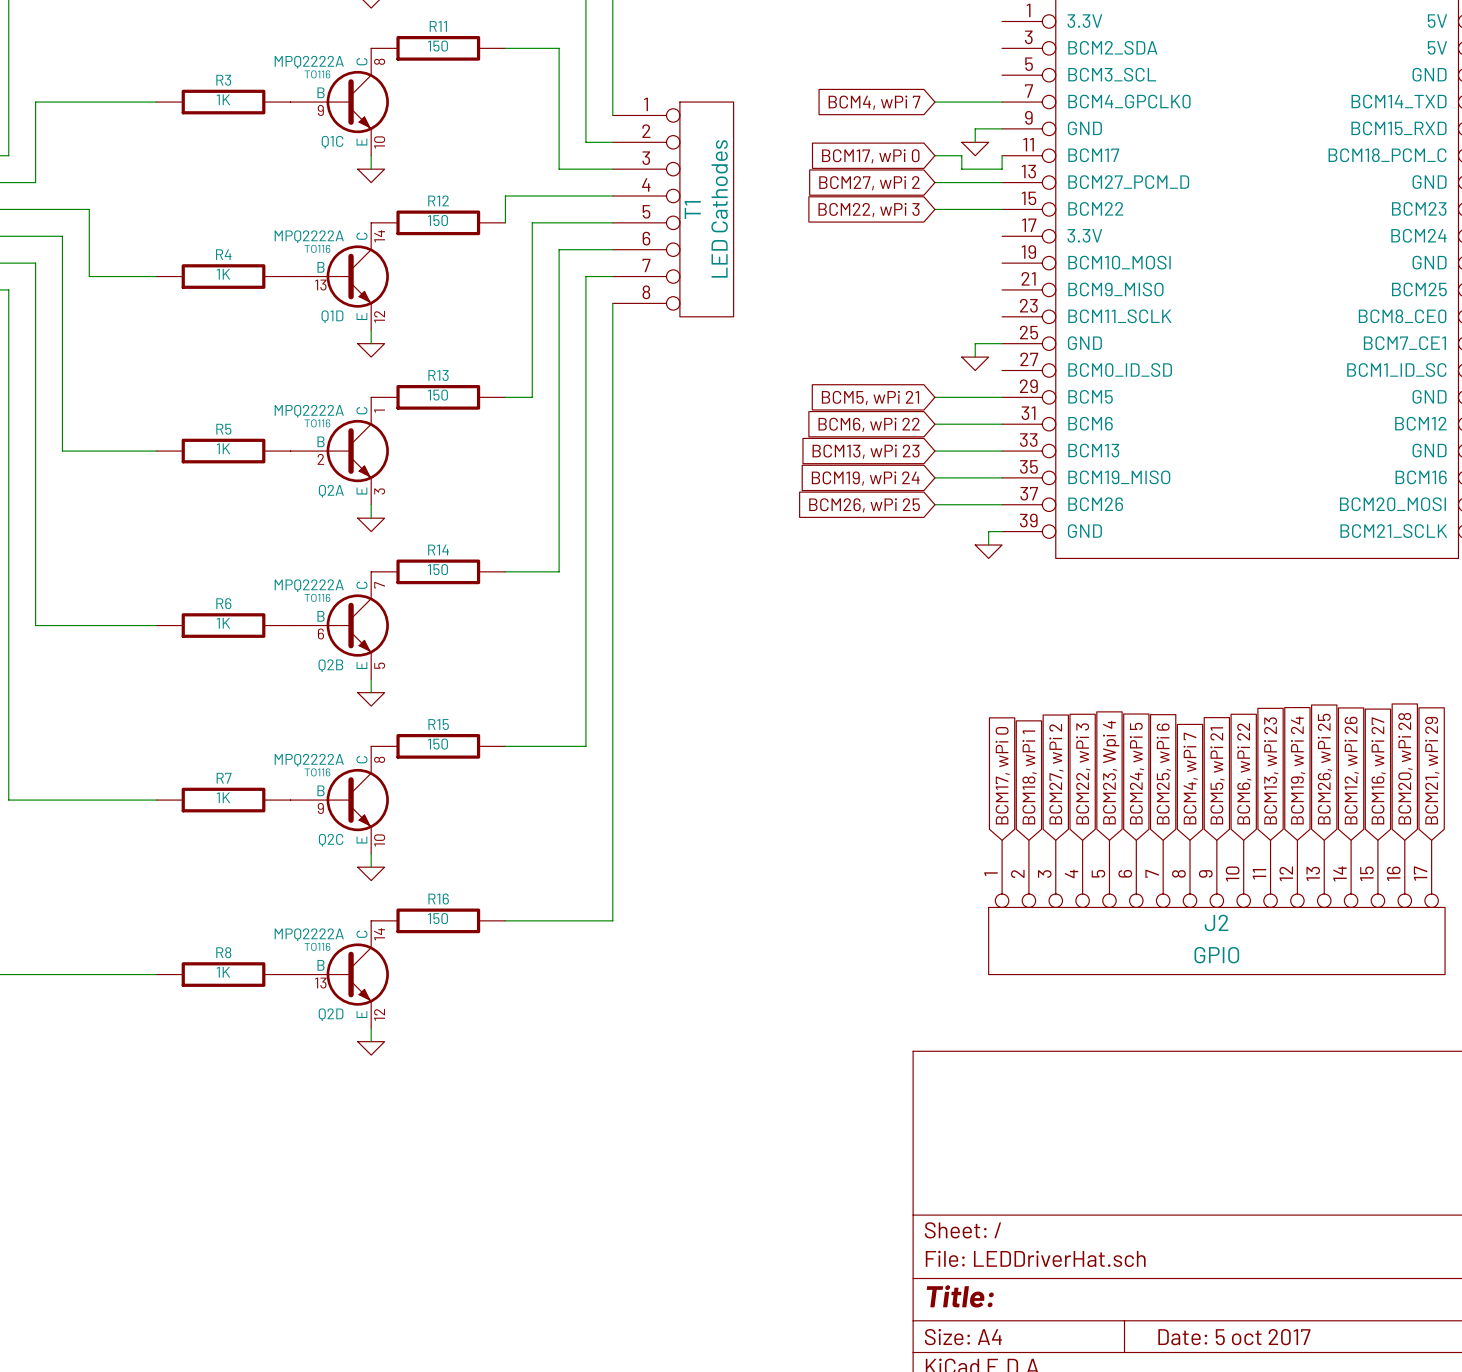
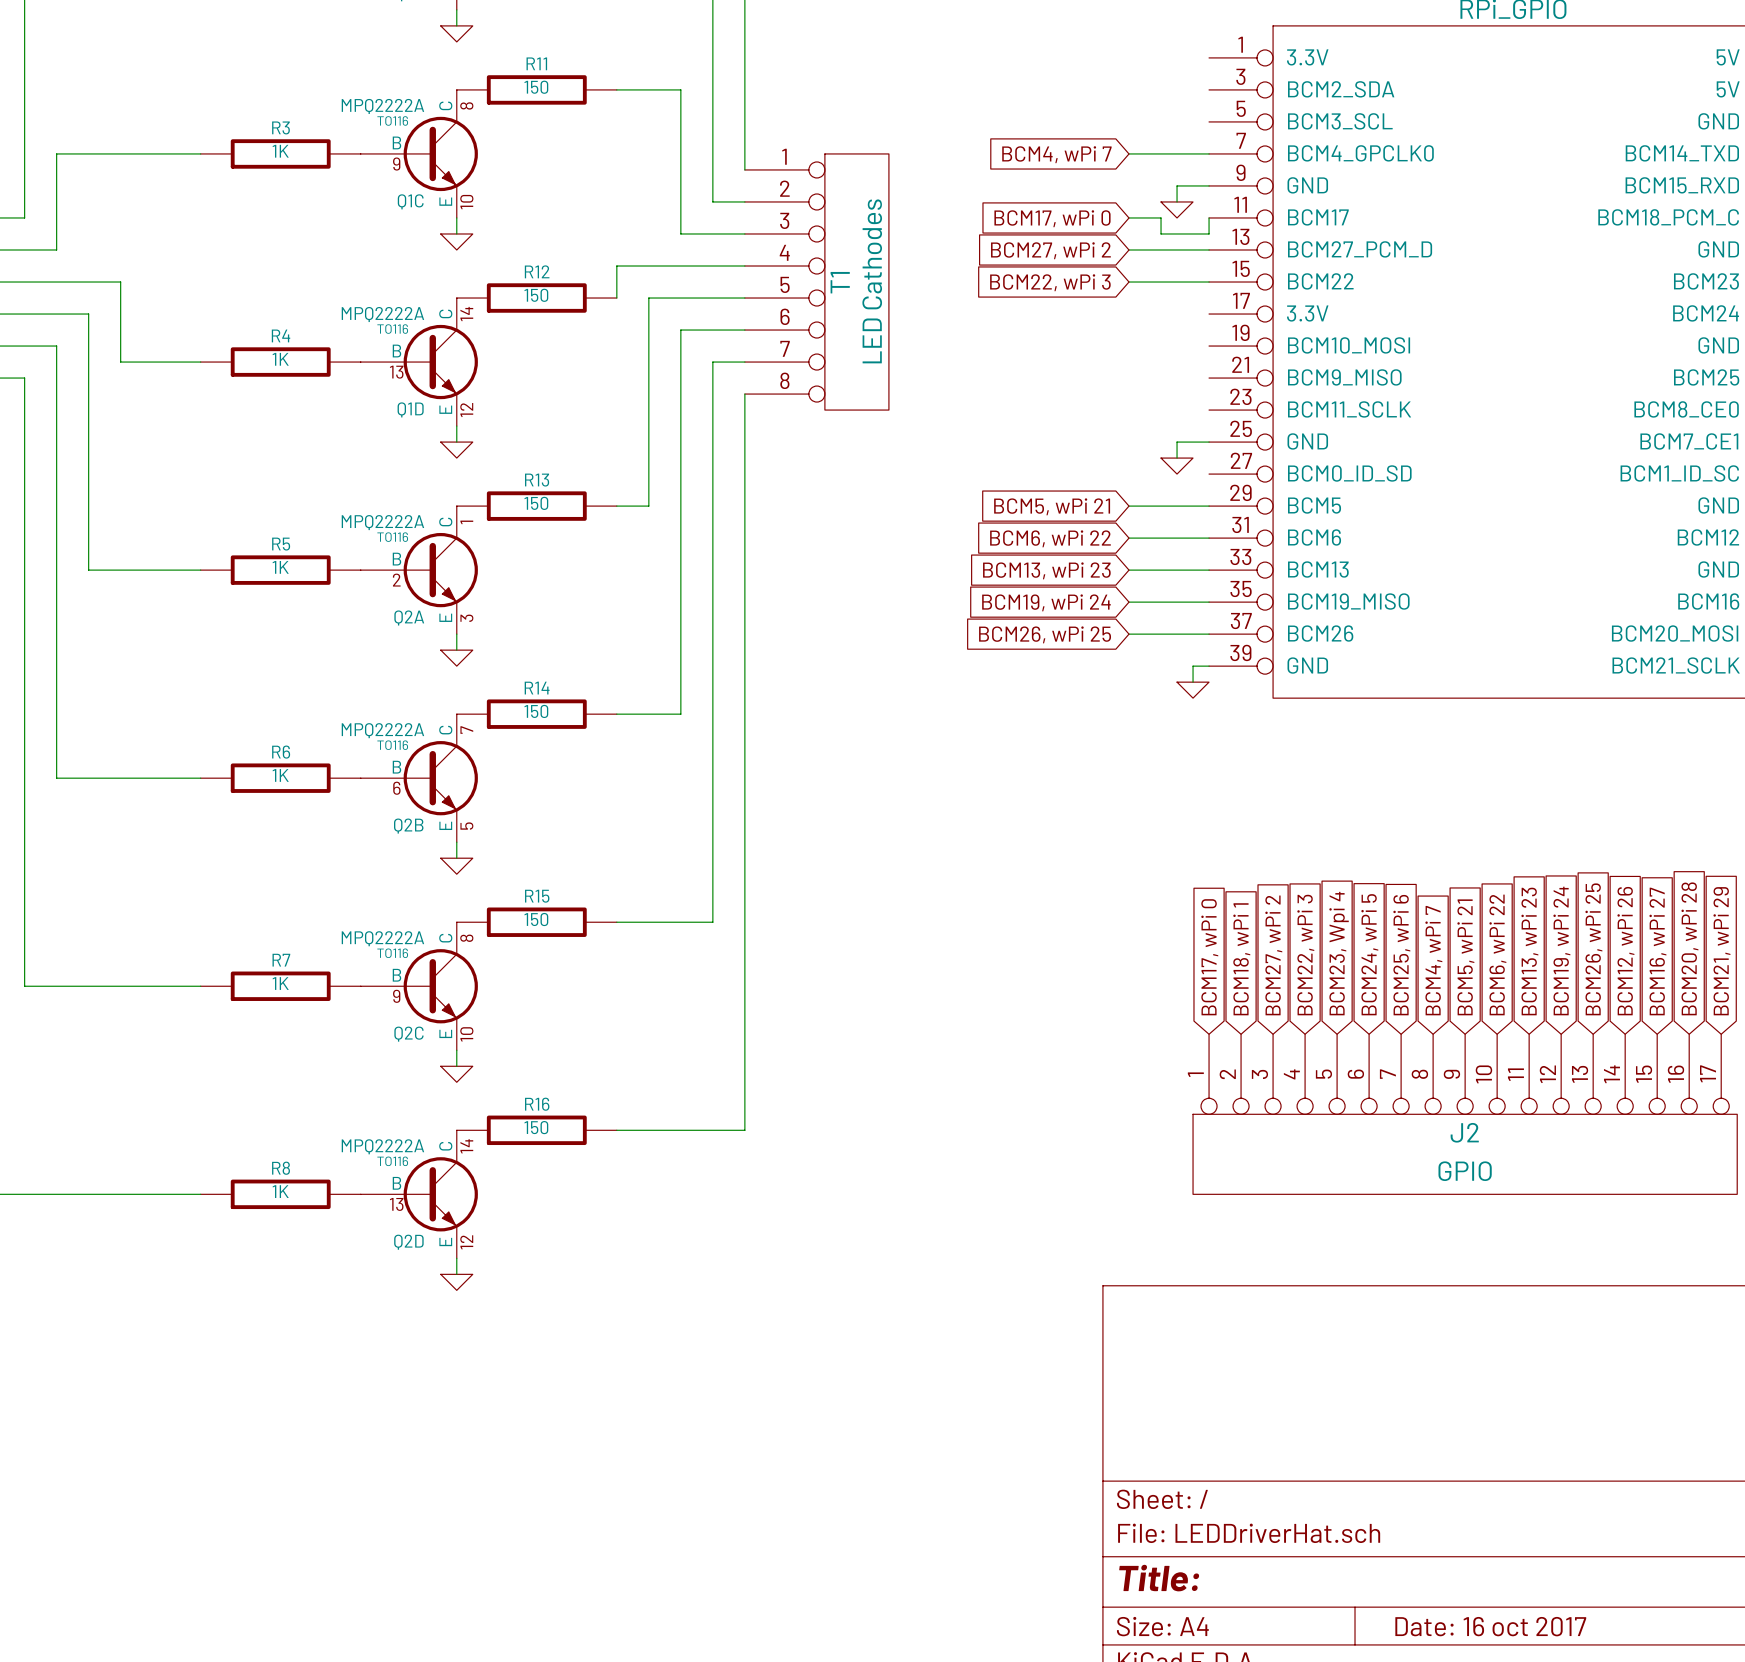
title block: Date: 5 oct 2017 (1234, 1337) -> Date: 16 oct 2017 (1490, 1626)

